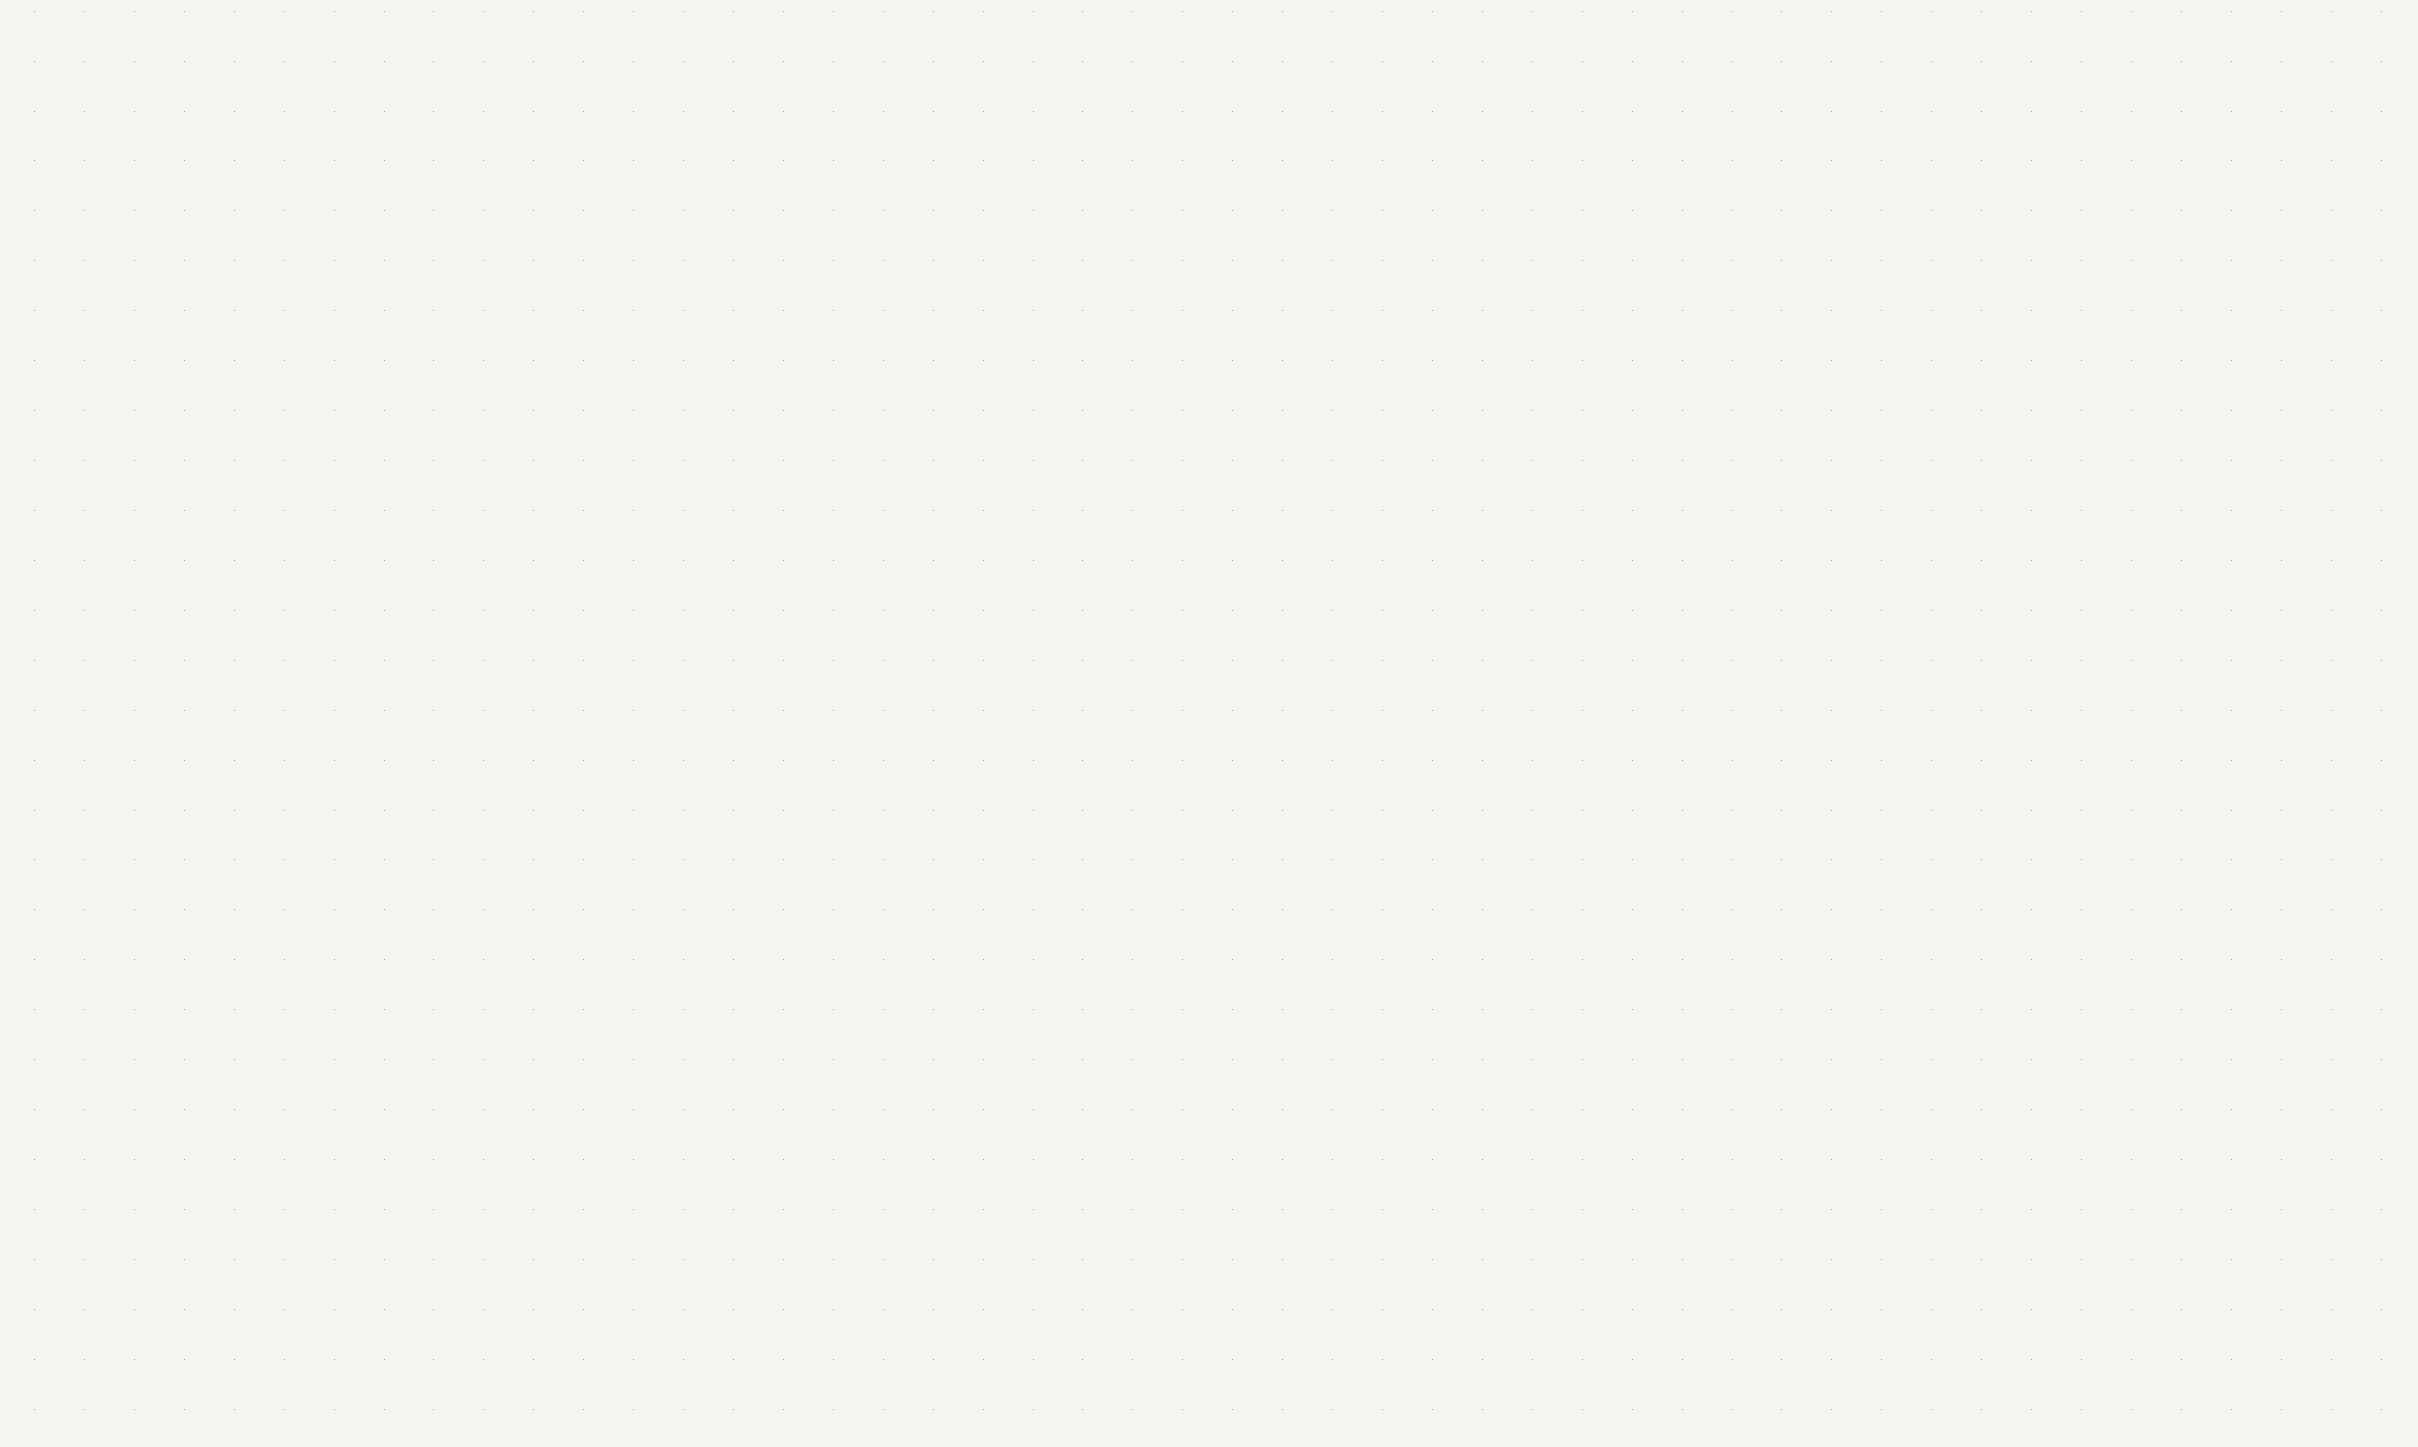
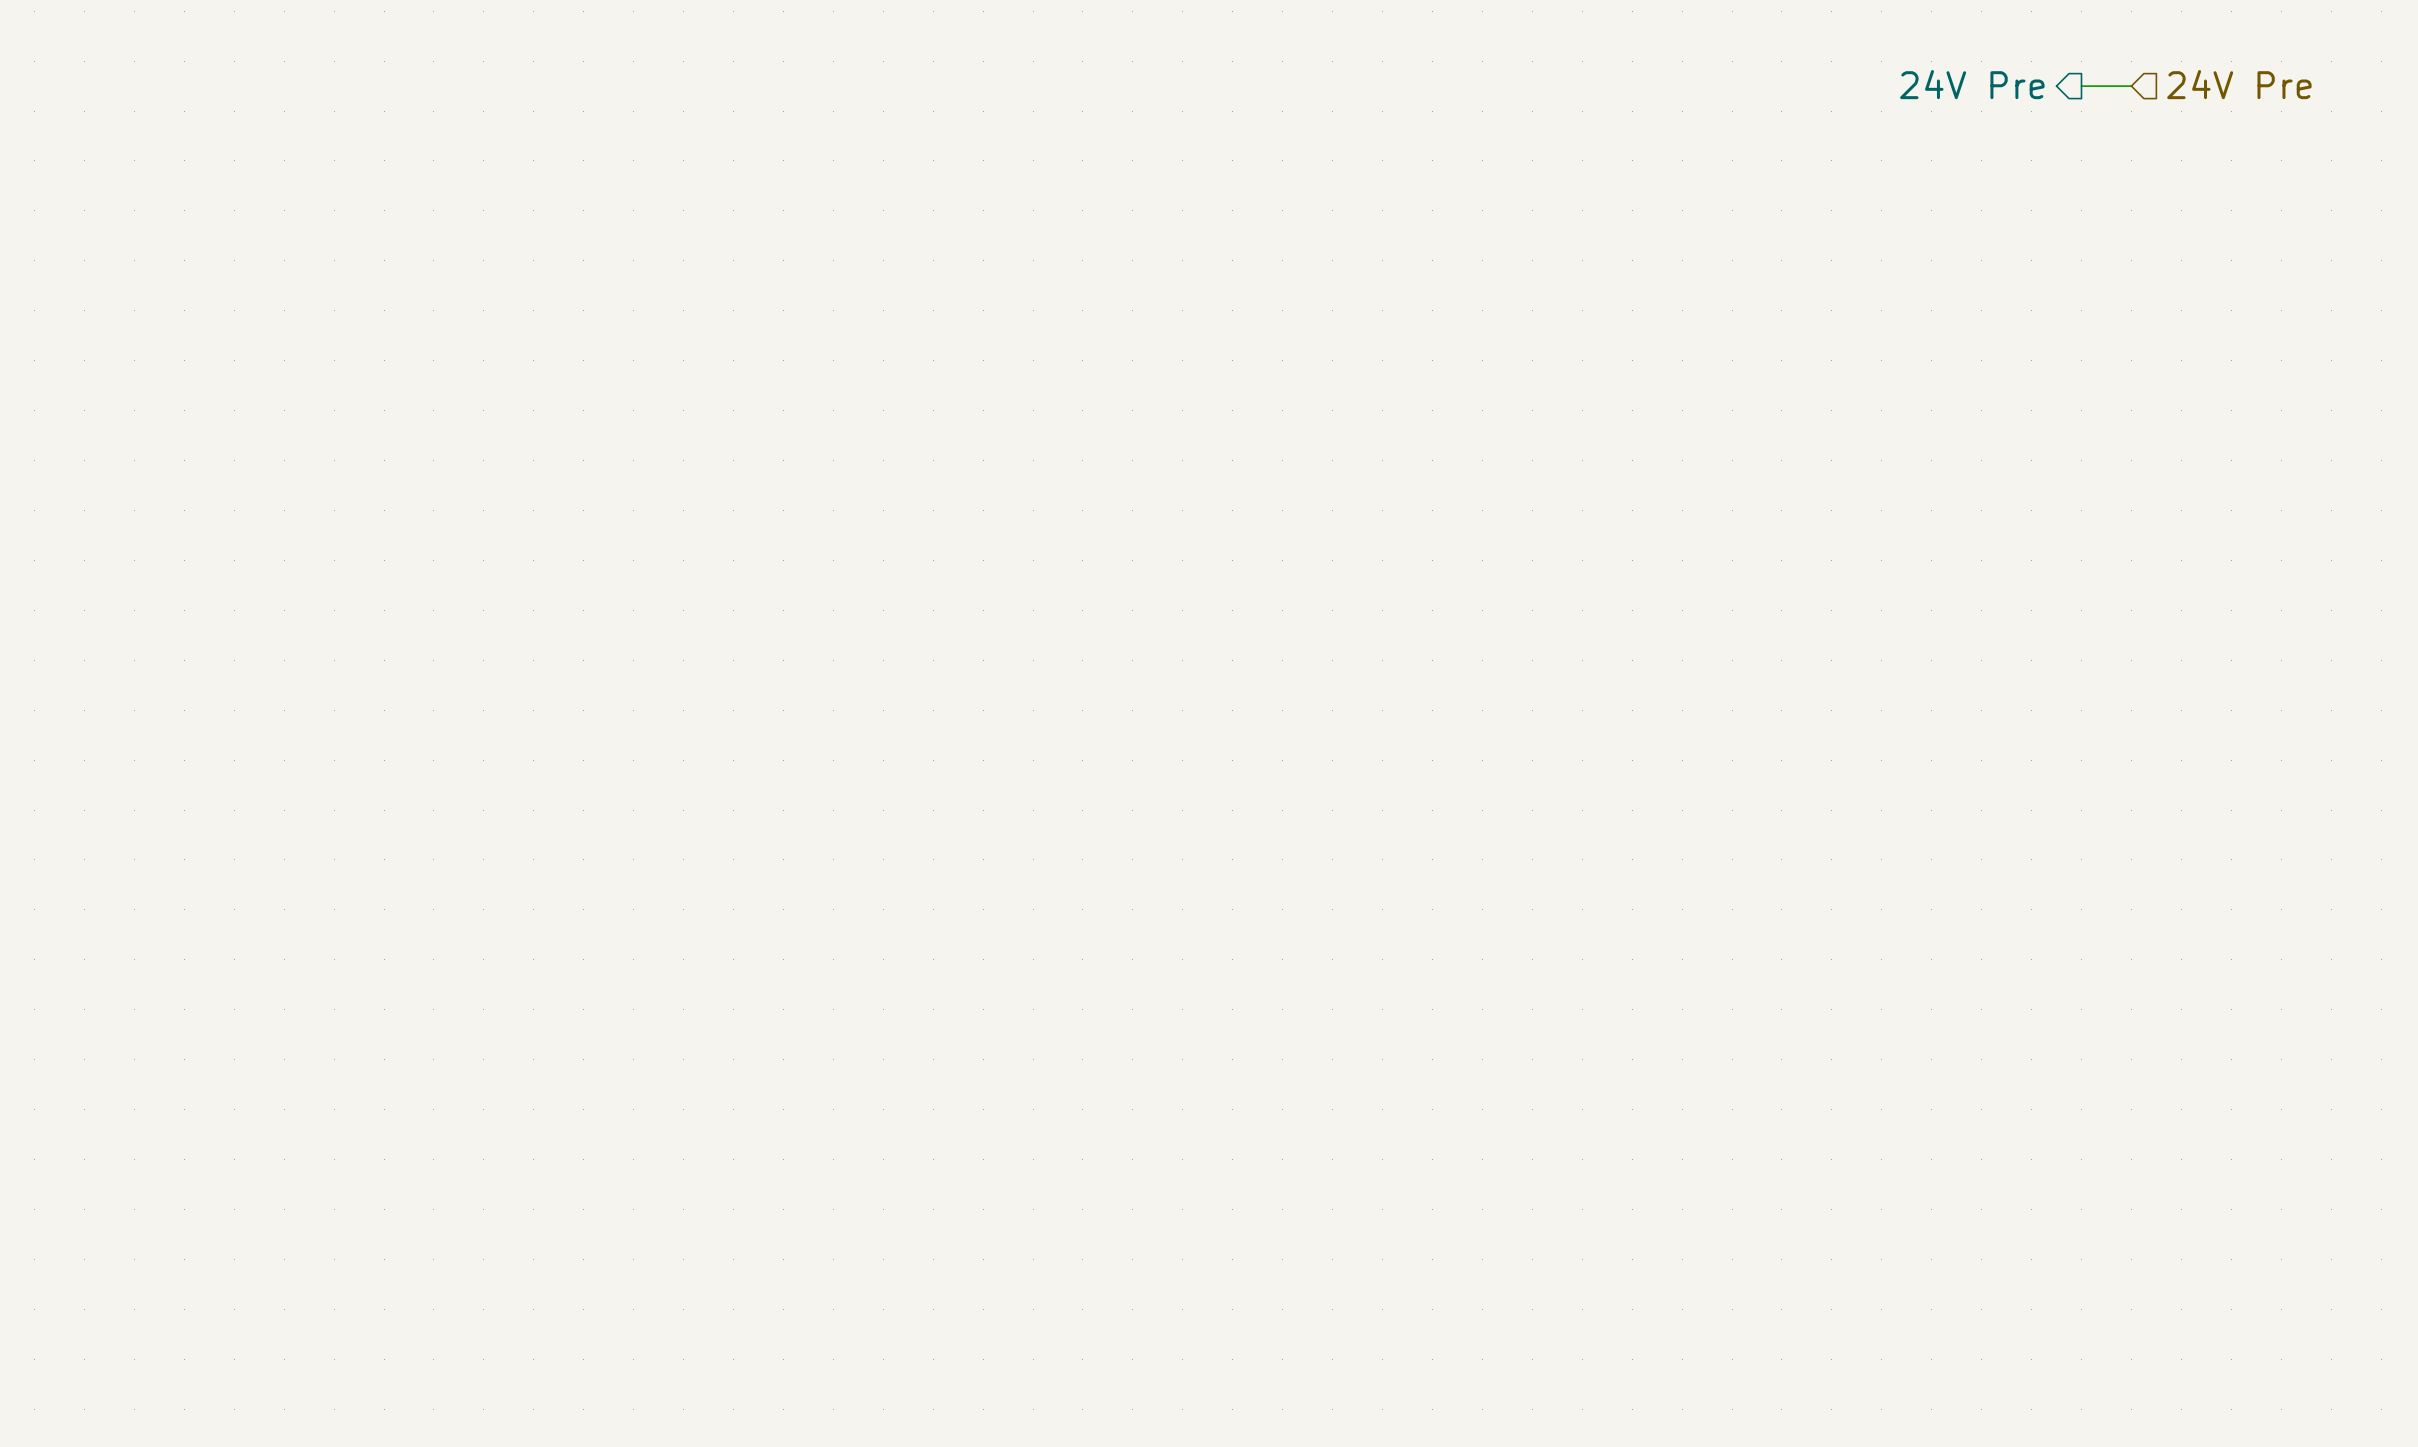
sheet pin: none -> 24V Pre (1972, 84)
hierarchical label: none -> 24V Pre (2239, 84)
wire: none -> (2081, 86) (2131, 86)

